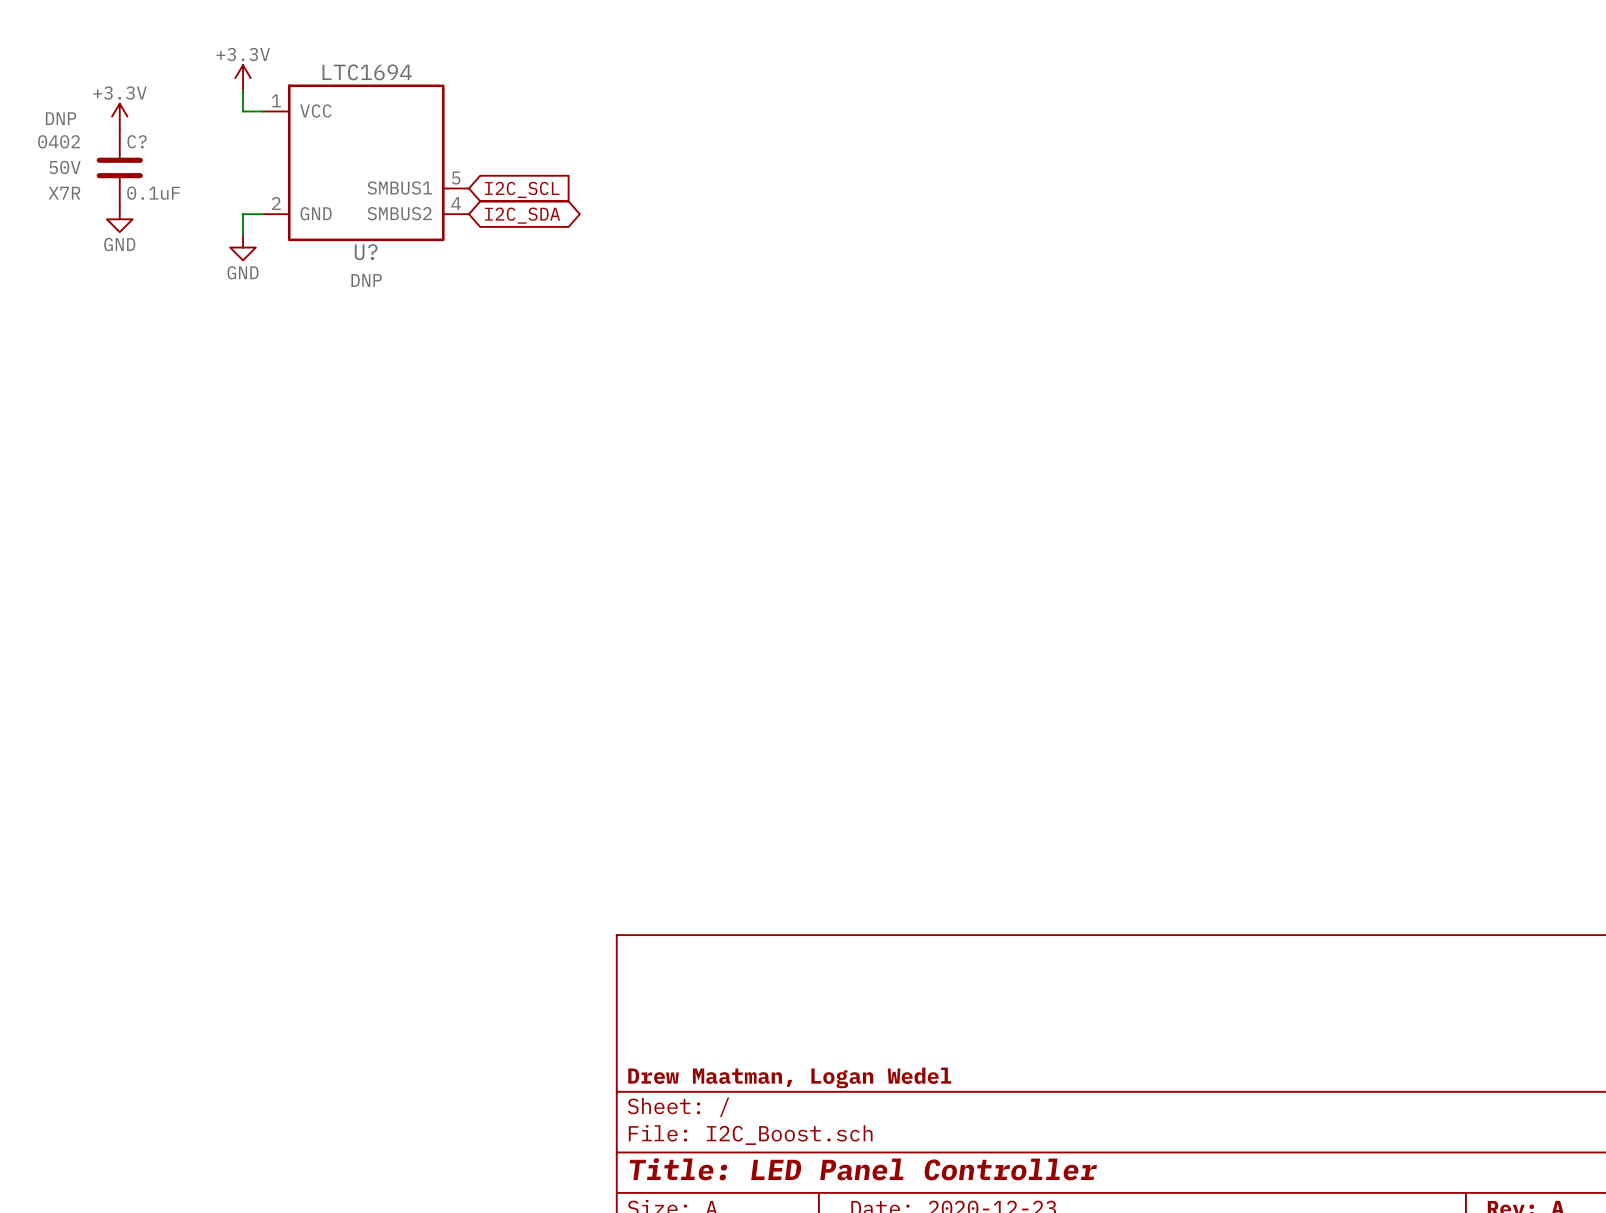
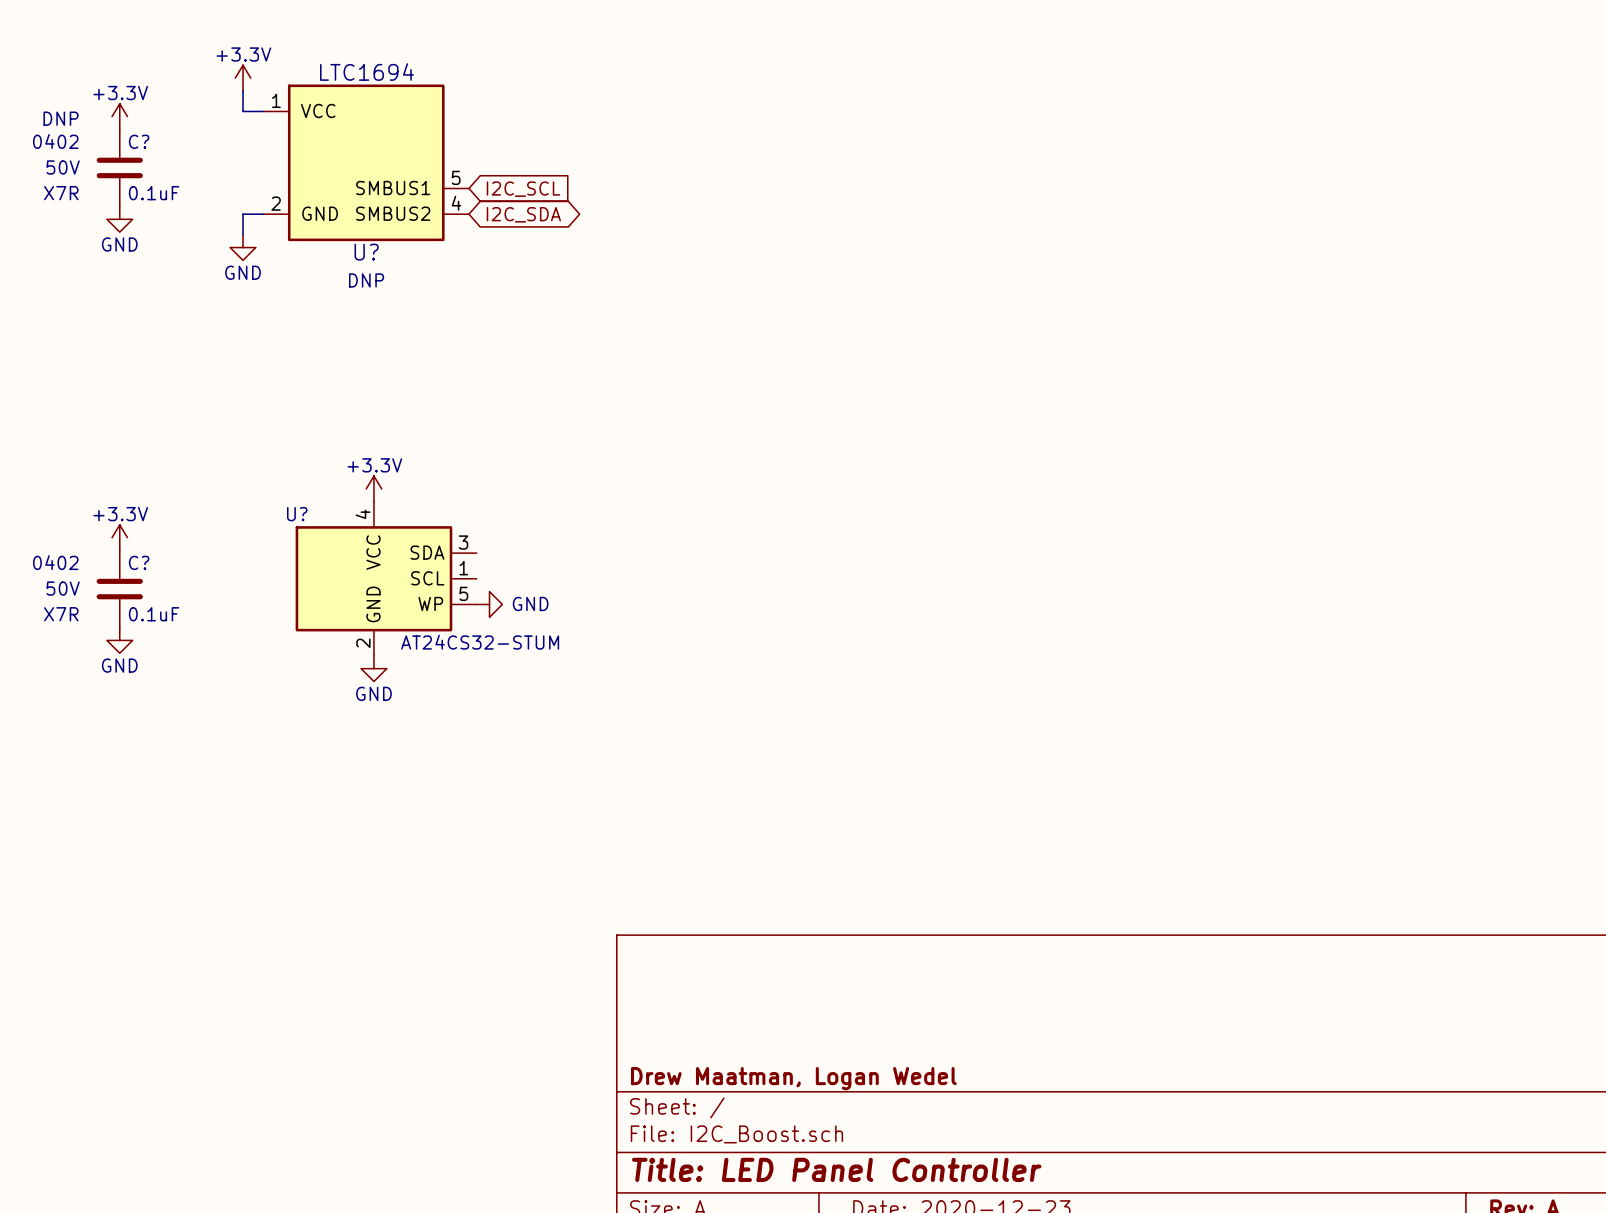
power symbol: none -> +3.3V (373, 488)
power symbol: none -> +3.3V (119, 537)
U?: none -> AT24CS32-STUM (386, 578)
C?: none -> 0.1uF (119, 589)
power symbol: none -> GND (489, 604)
power symbol: none -> GND (119, 640)
power symbol: none -> GND (373, 668)

